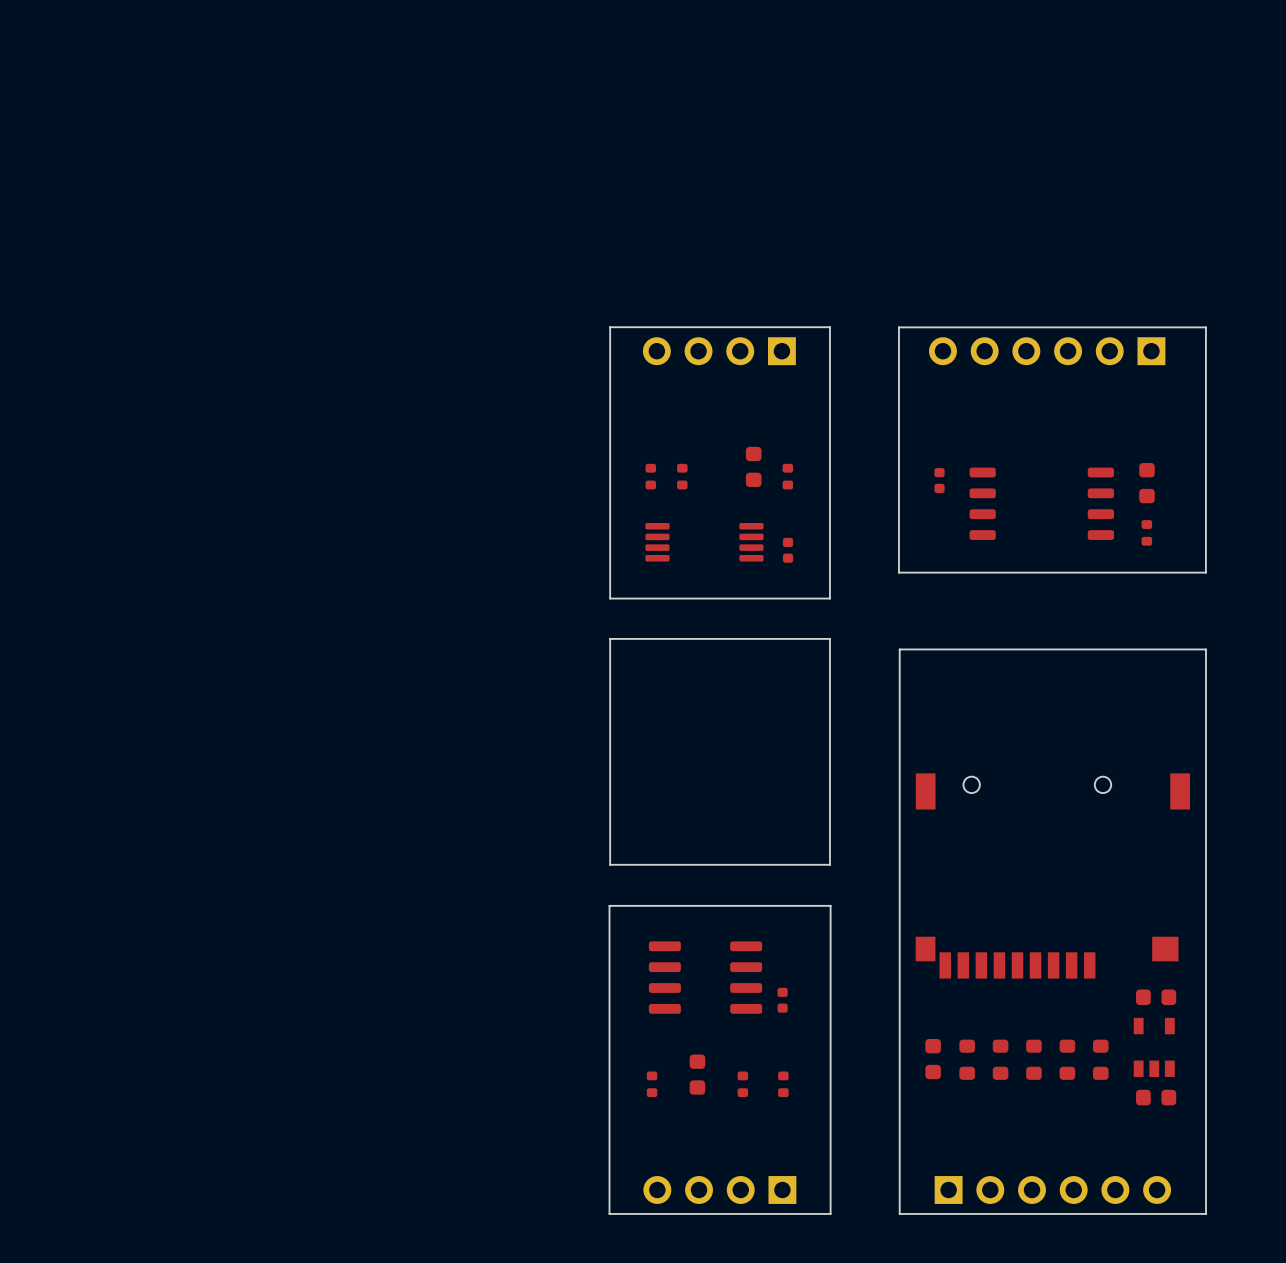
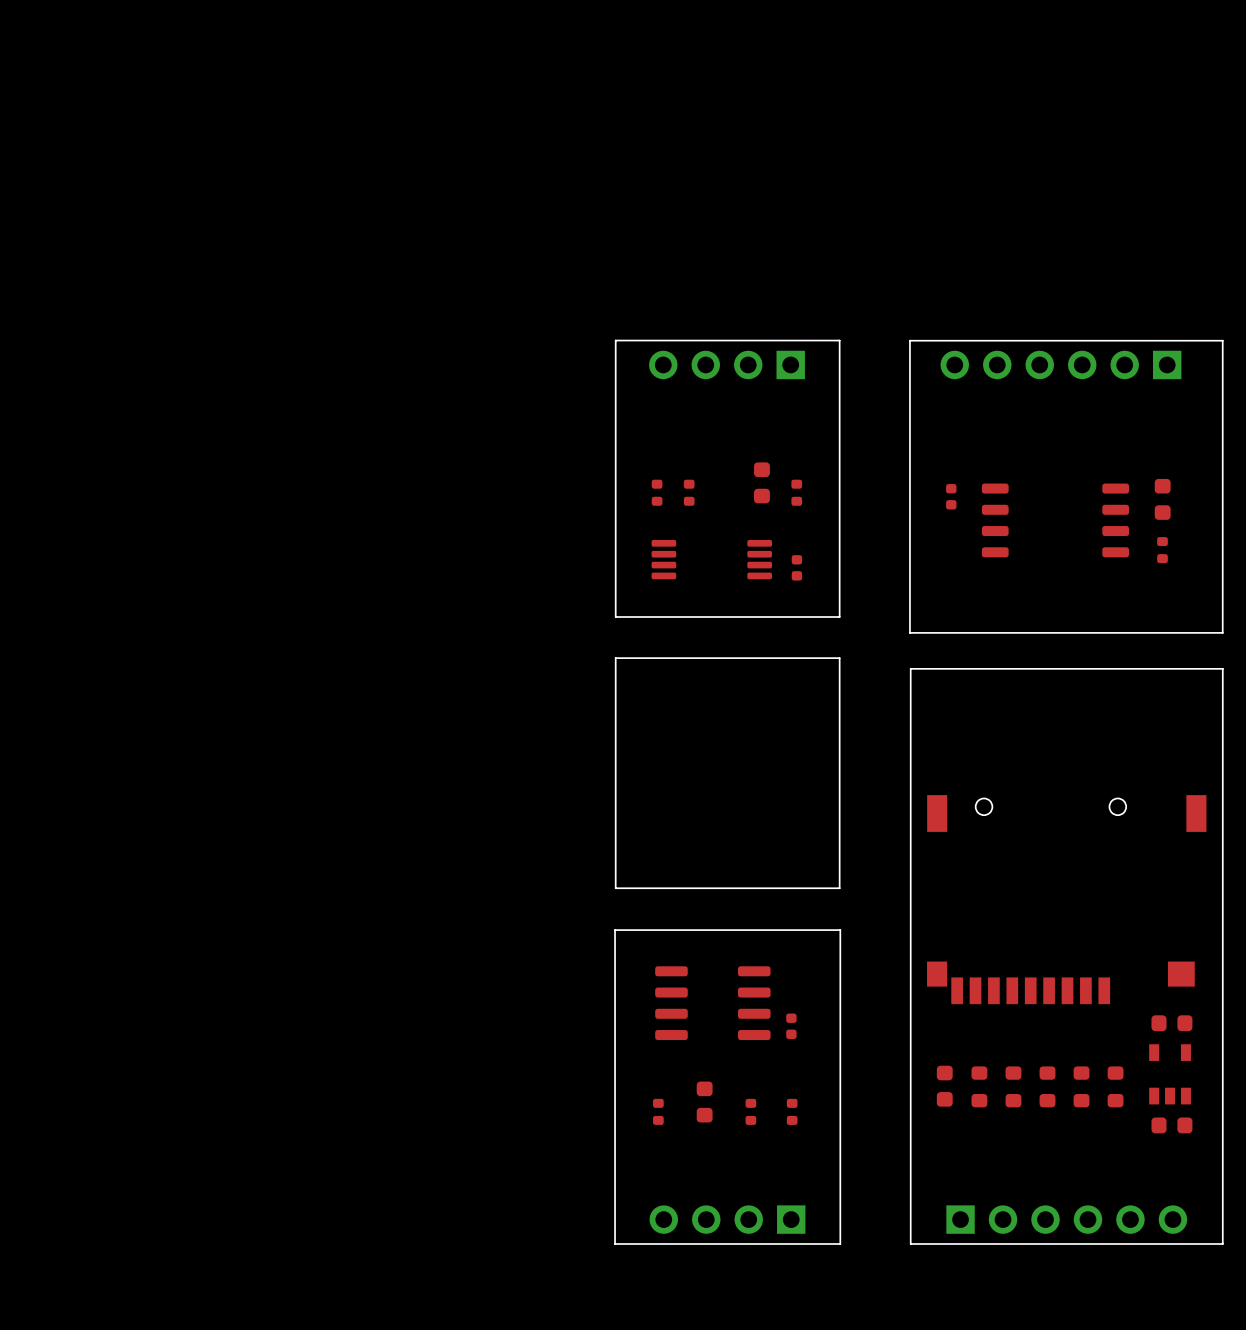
board edge: (1205, 572) (898, 572) -> (1222, 590) (1222, 632) (909, 632) (909, 590)

